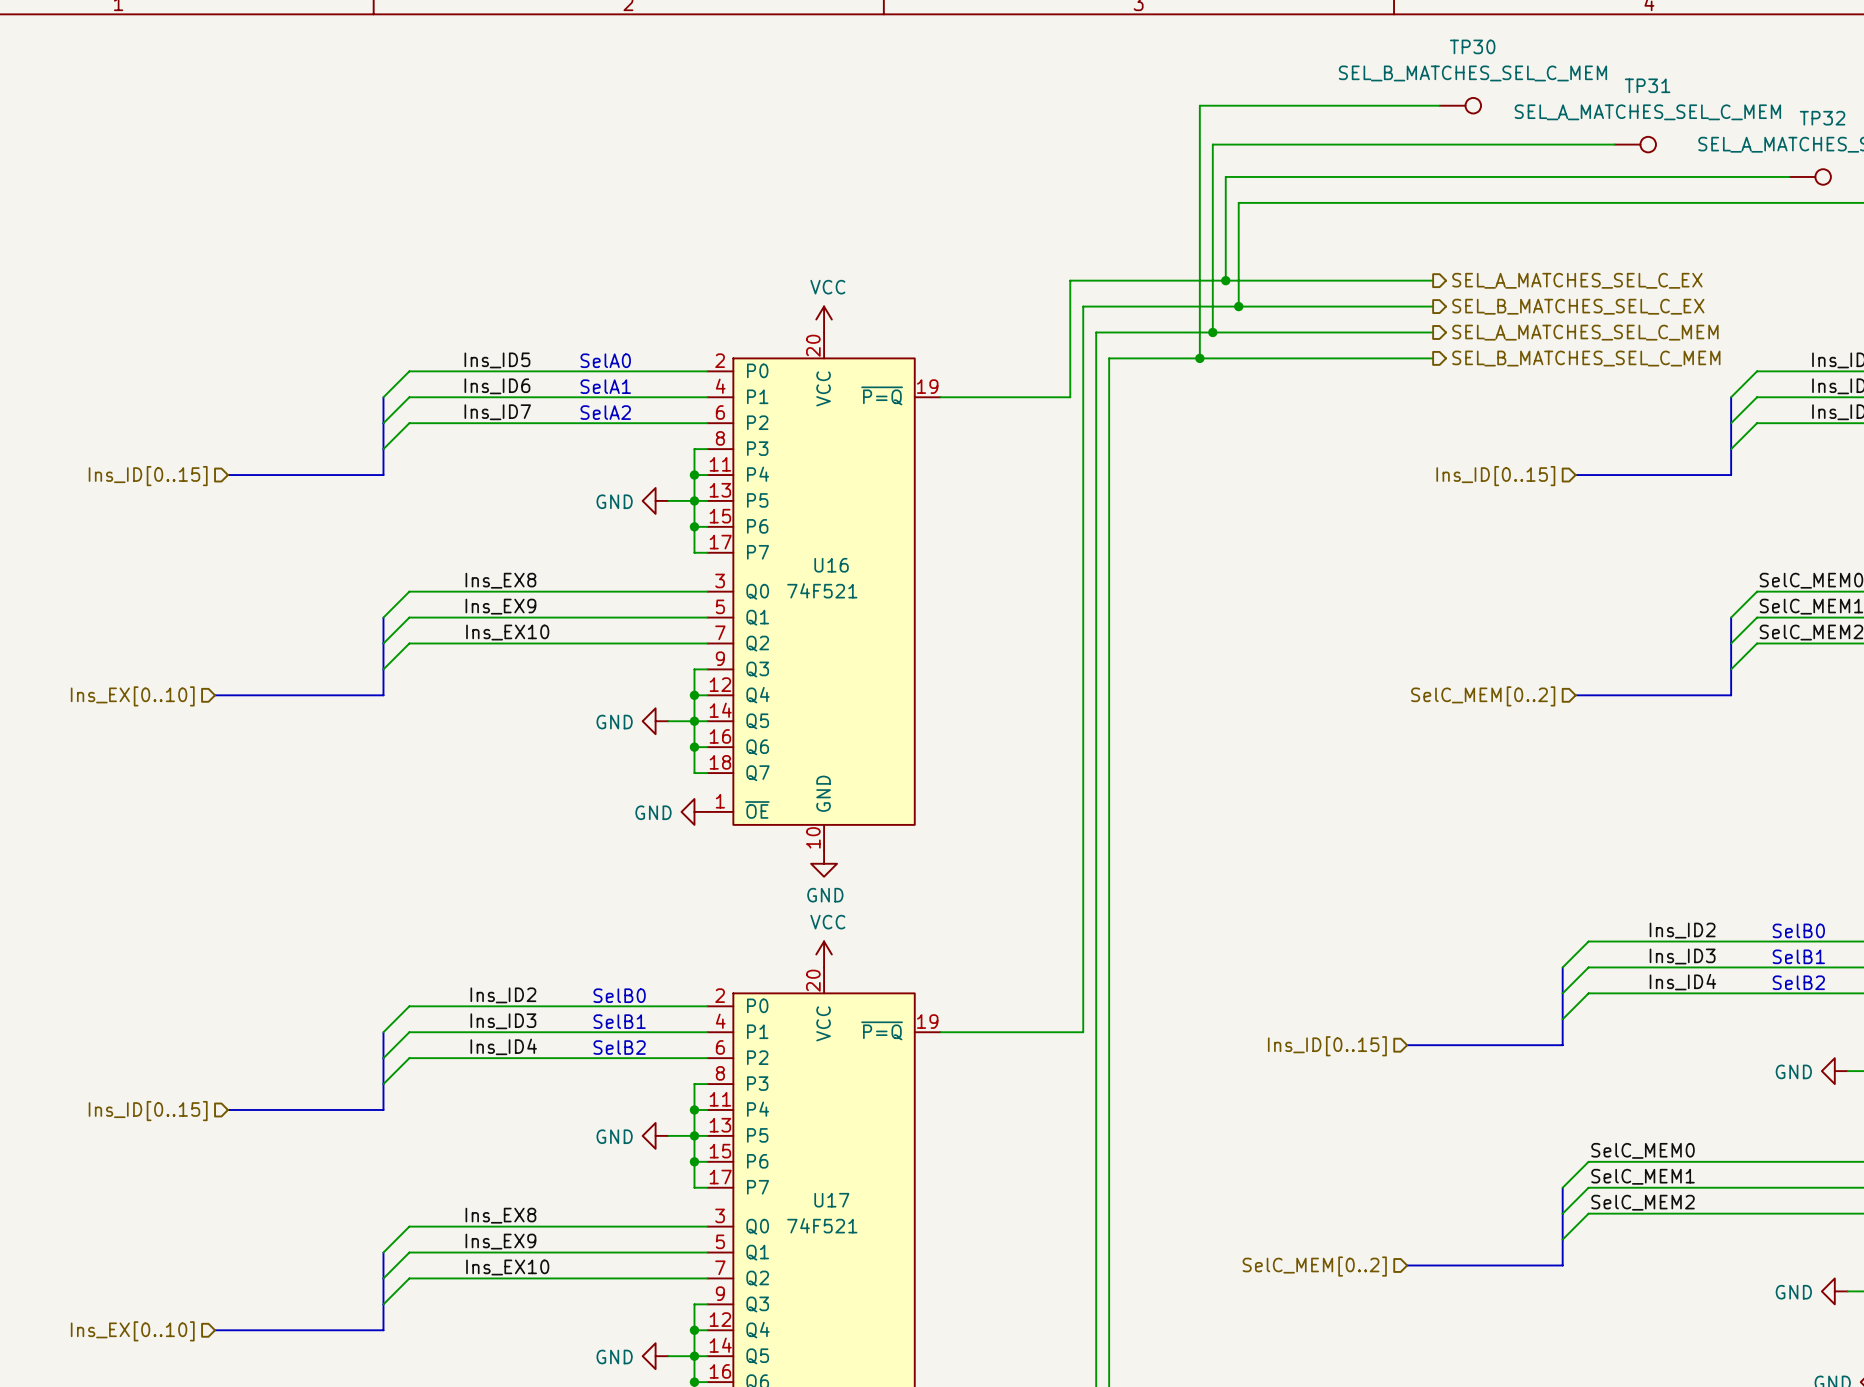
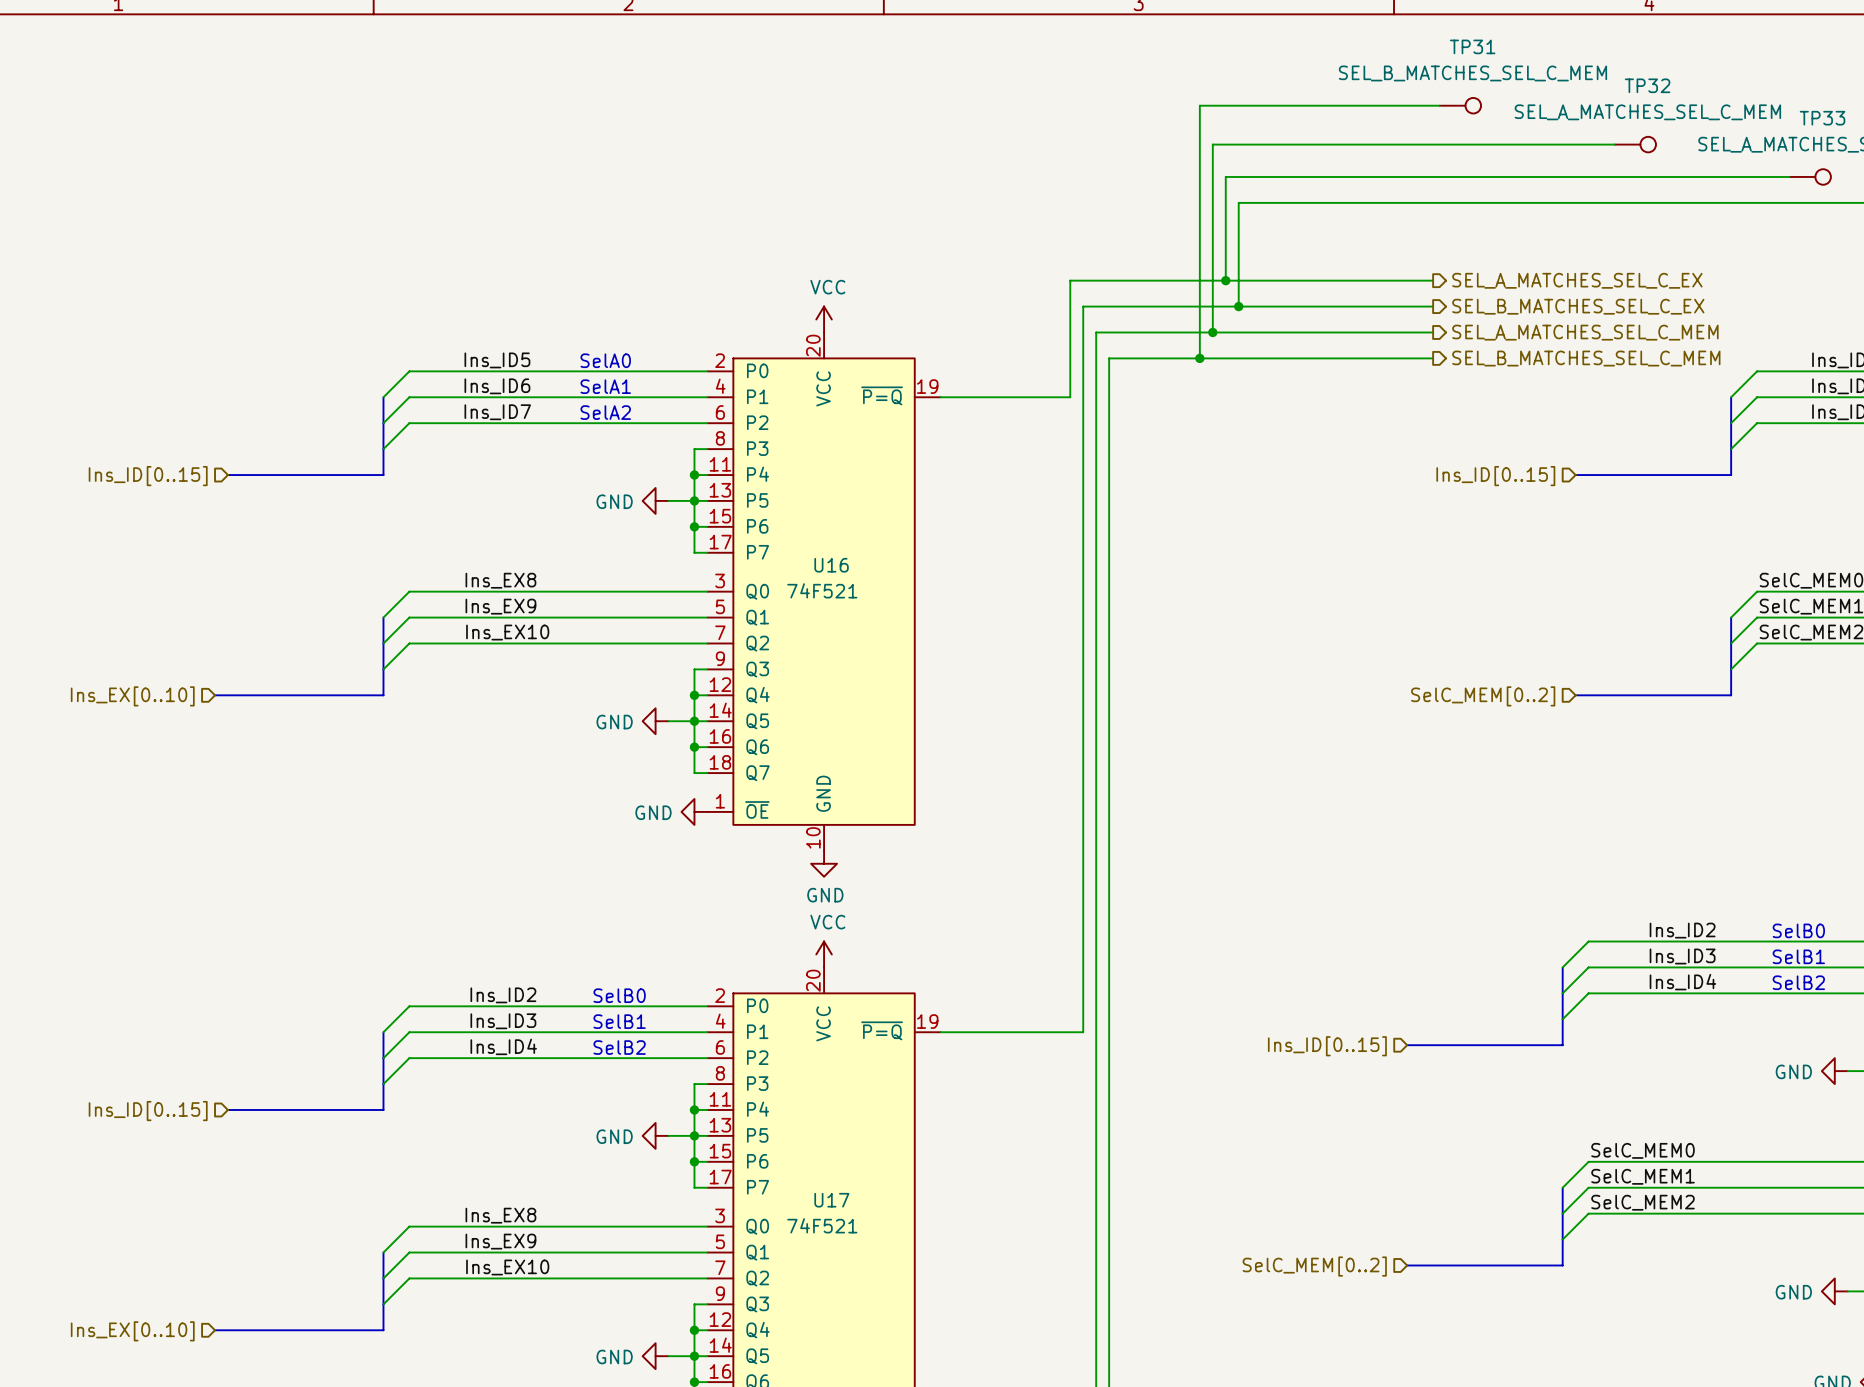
TP30 name: TP30 (1472, 46) -> TP31 (1472, 46)
TP31 name: TP31 (1647, 85) -> TP32 (1647, 85)
TP32 name: TP32 (1822, 118) -> TP33 (1822, 118)

